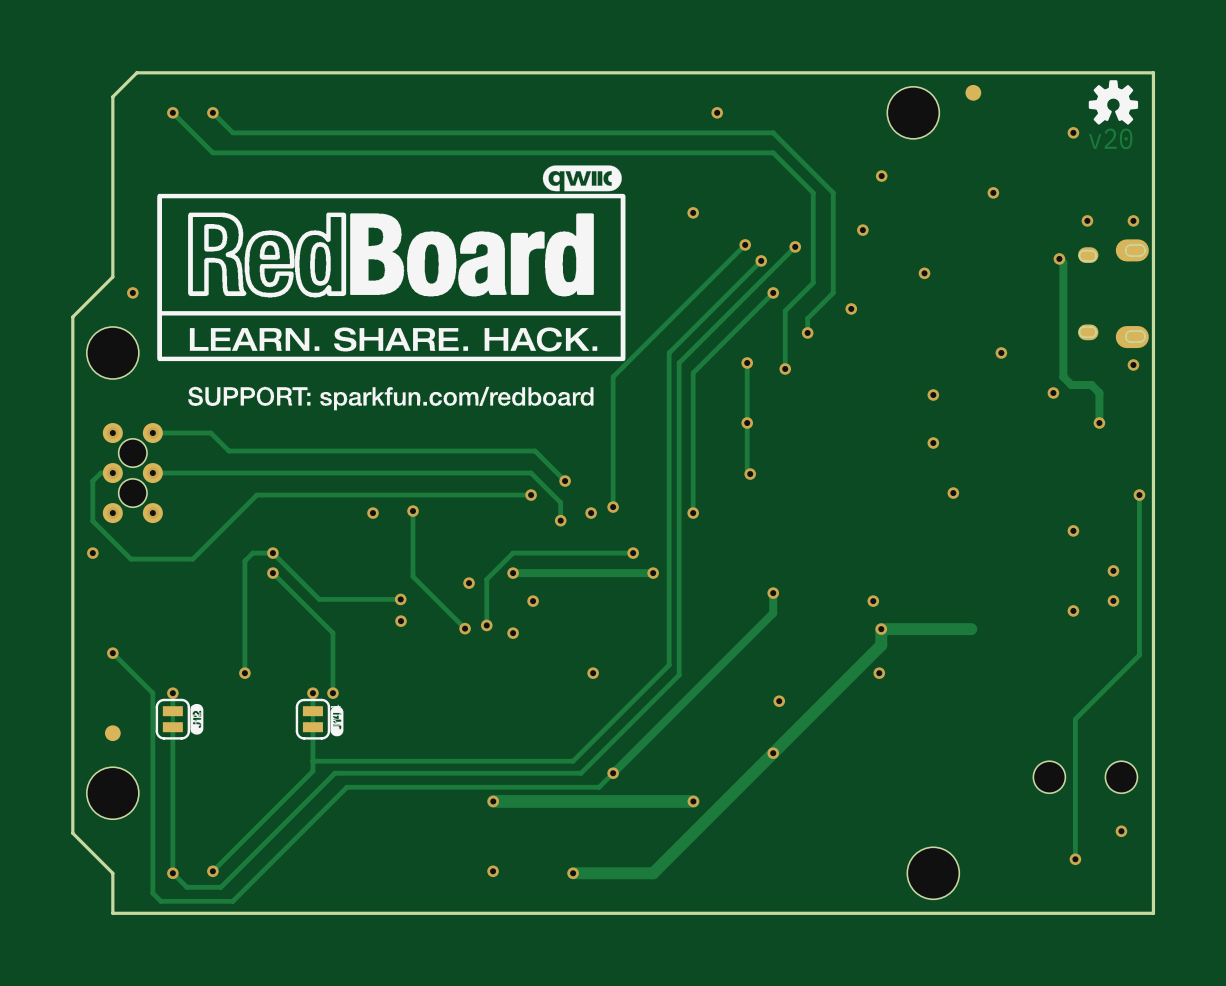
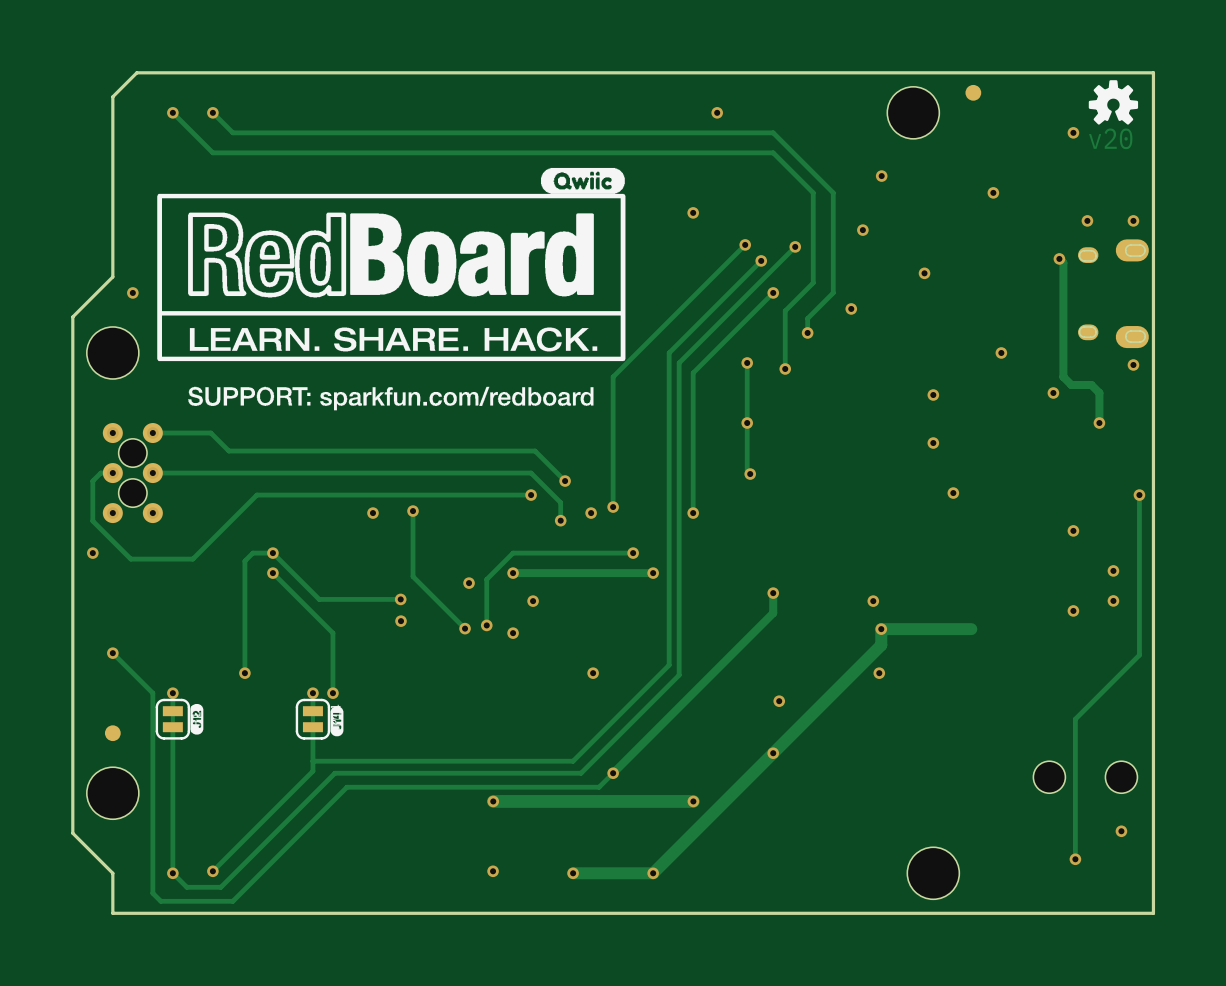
drawing shape: [542, 165, 622, 192] -> [540, 167, 625, 194]
via: none -> (653, 873)

